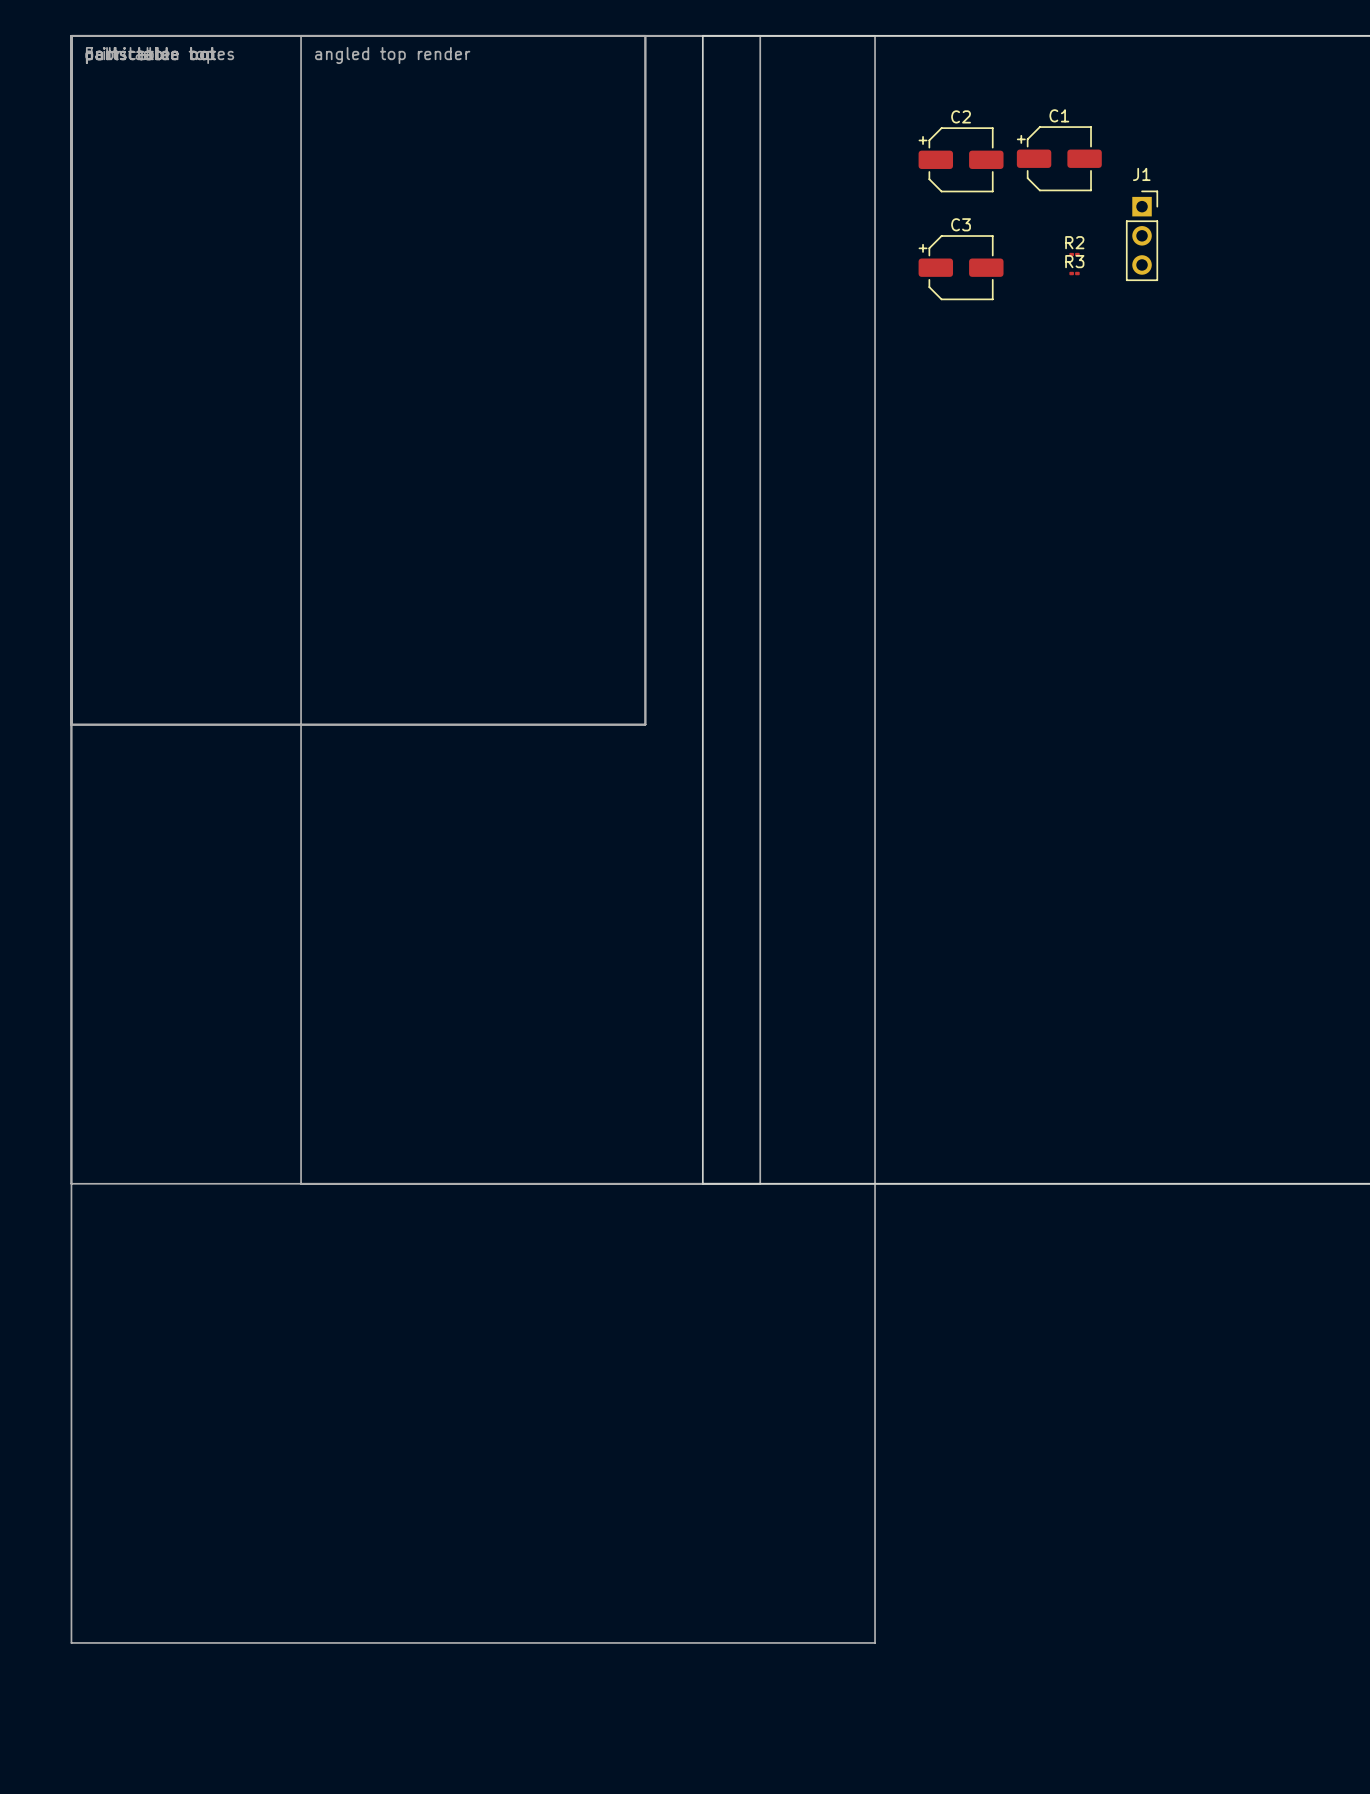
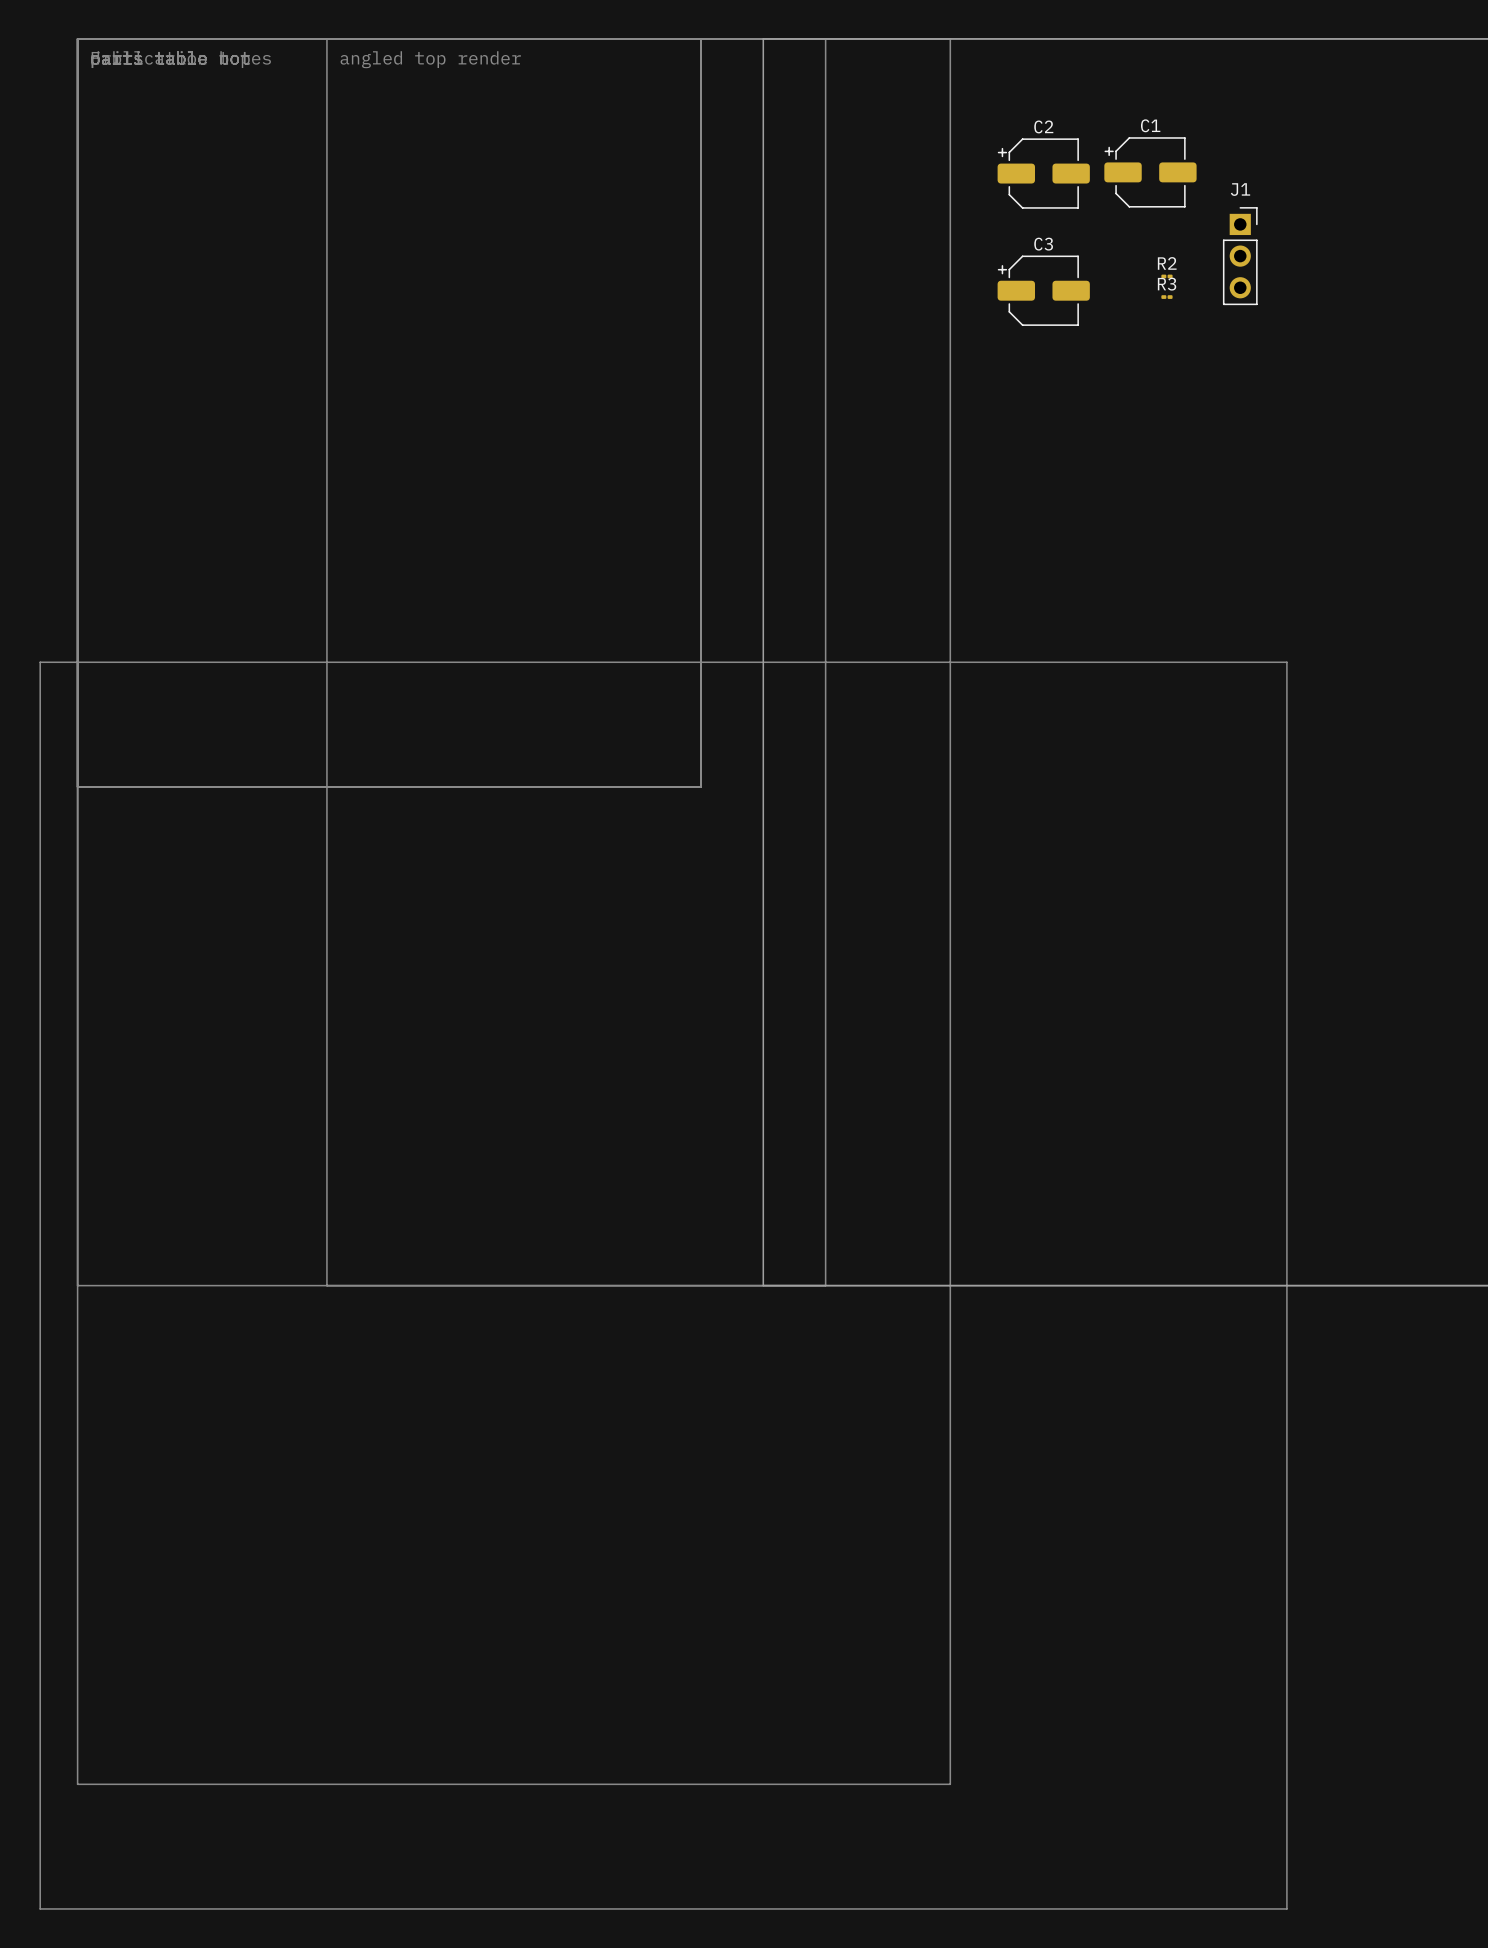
line: none -> (40, 662) (1286, 662) (1286, 1908) (40, 1908) (40, 662)

